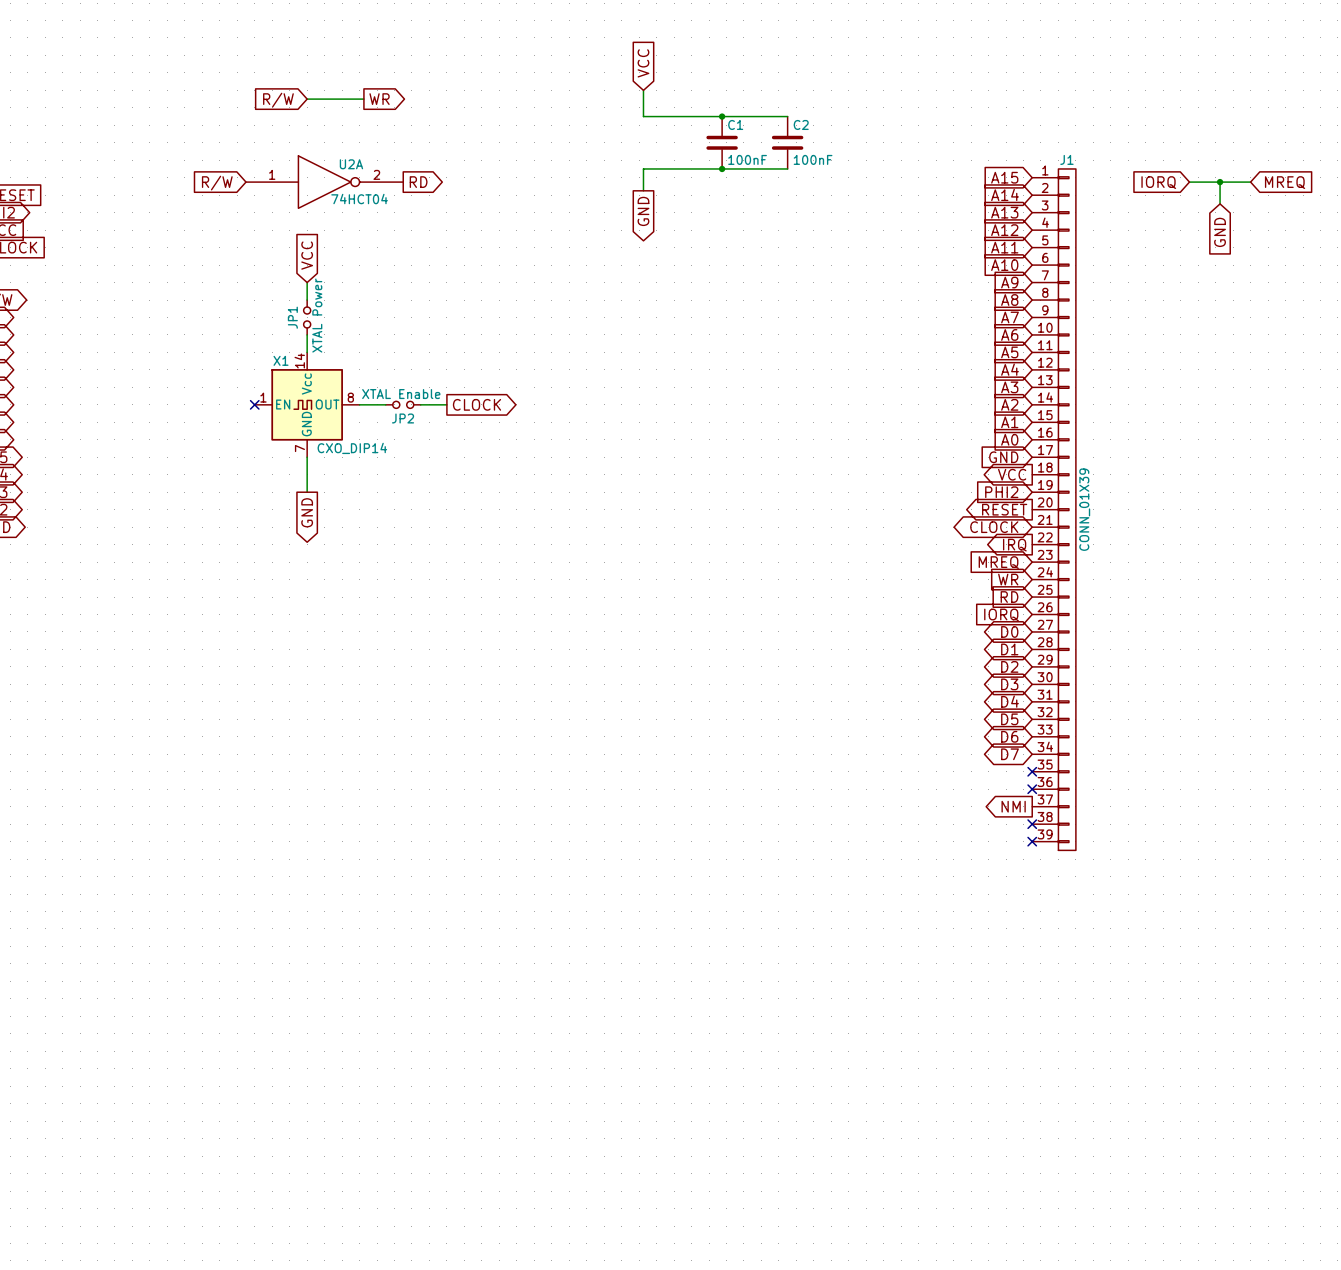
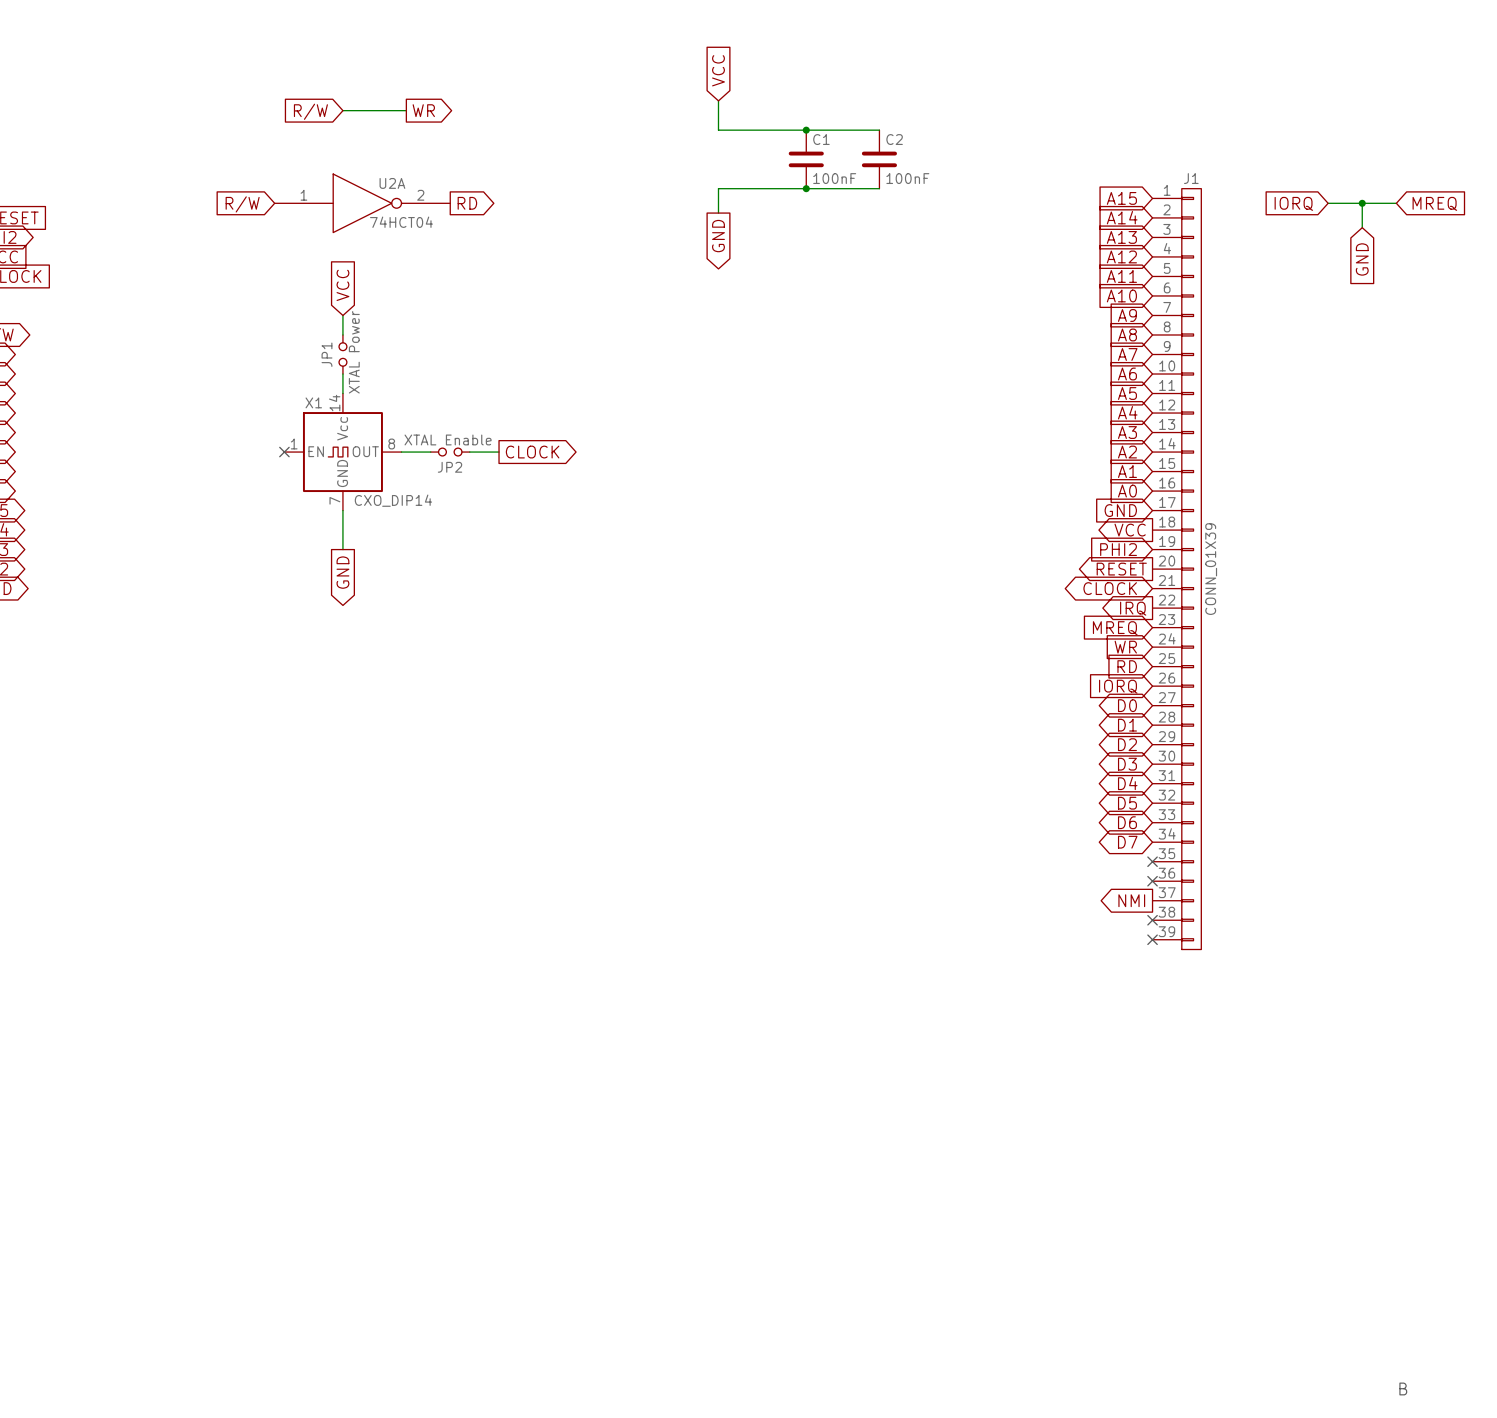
text: none -> B (1403, 1388)

